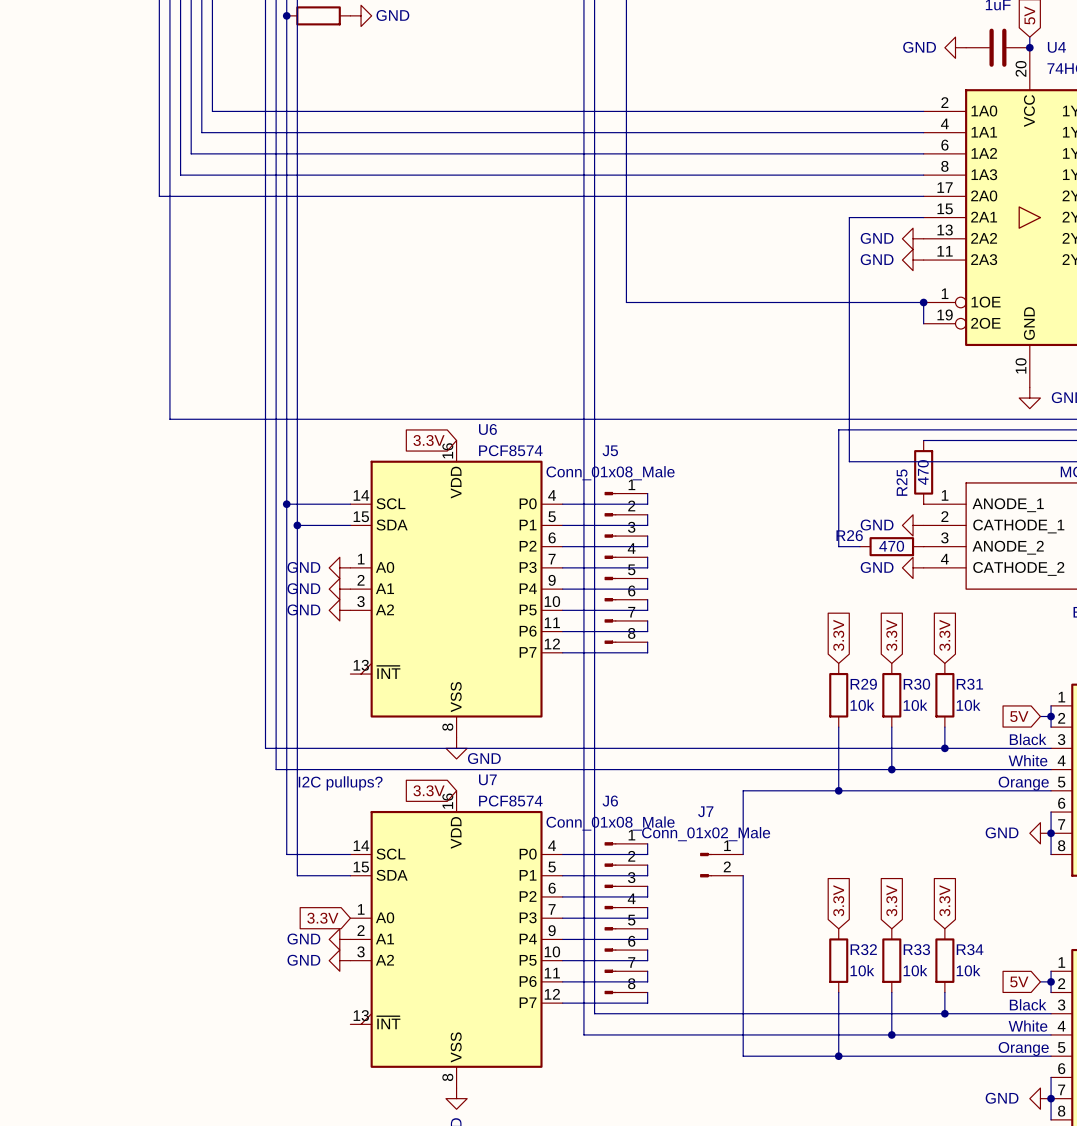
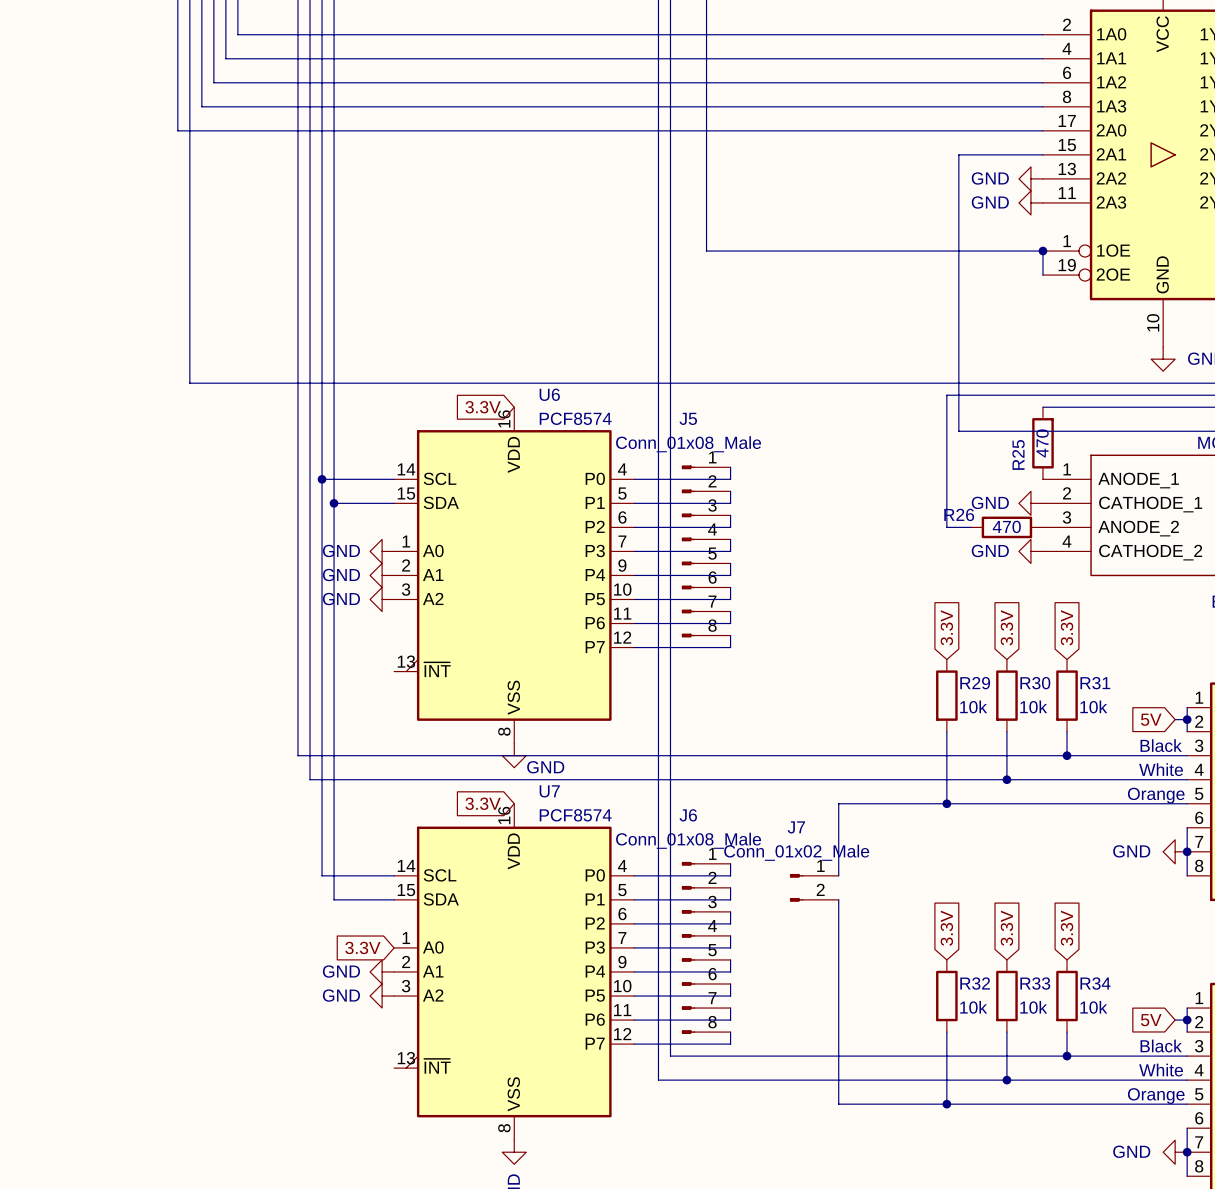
text: I2C pullups? (340, 783) -> none

